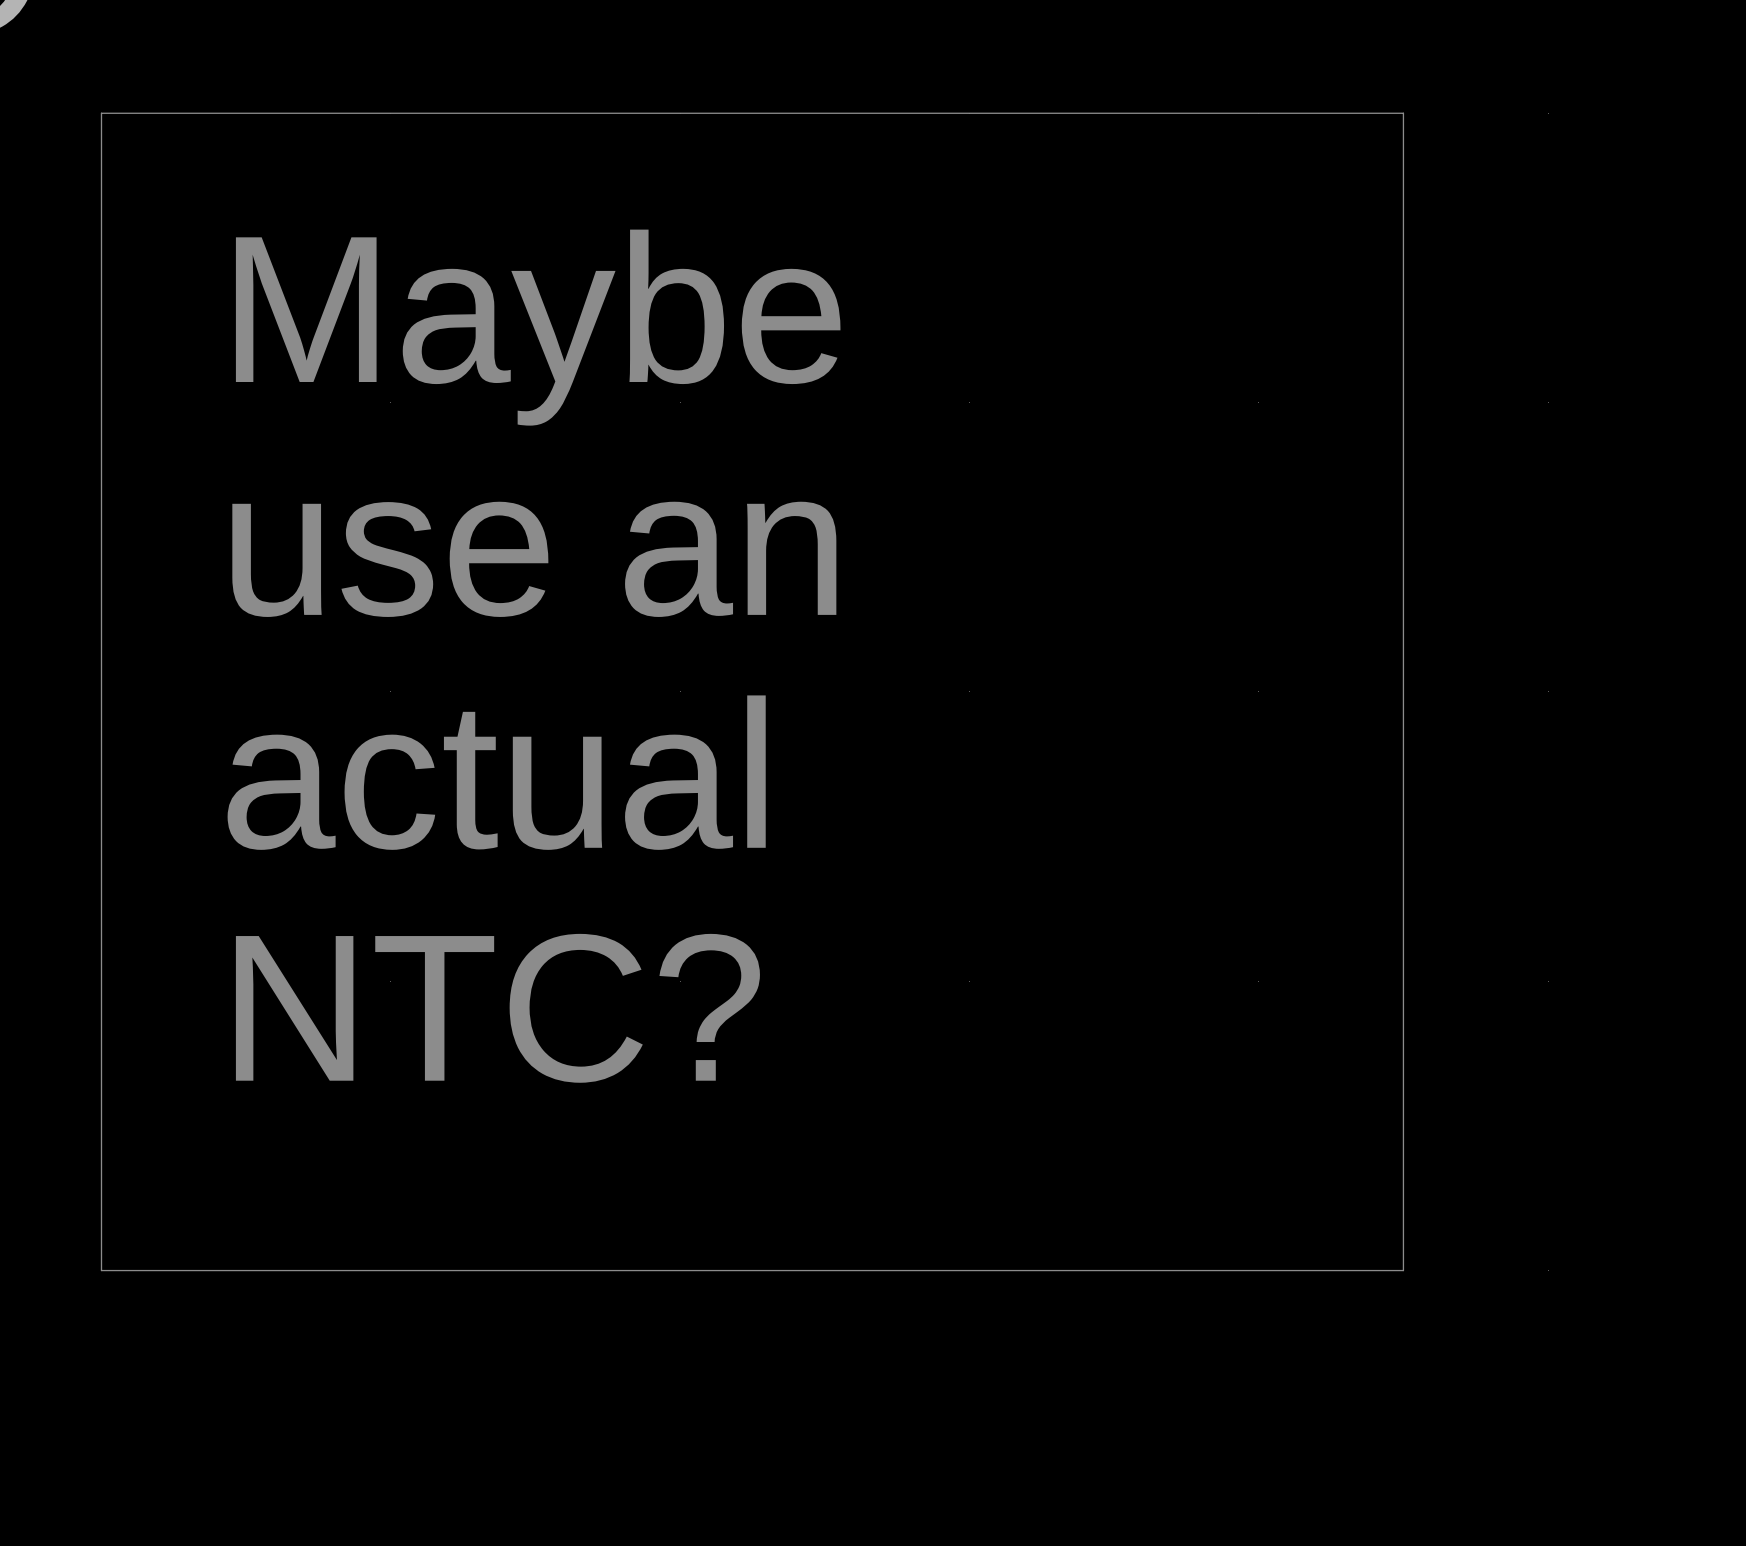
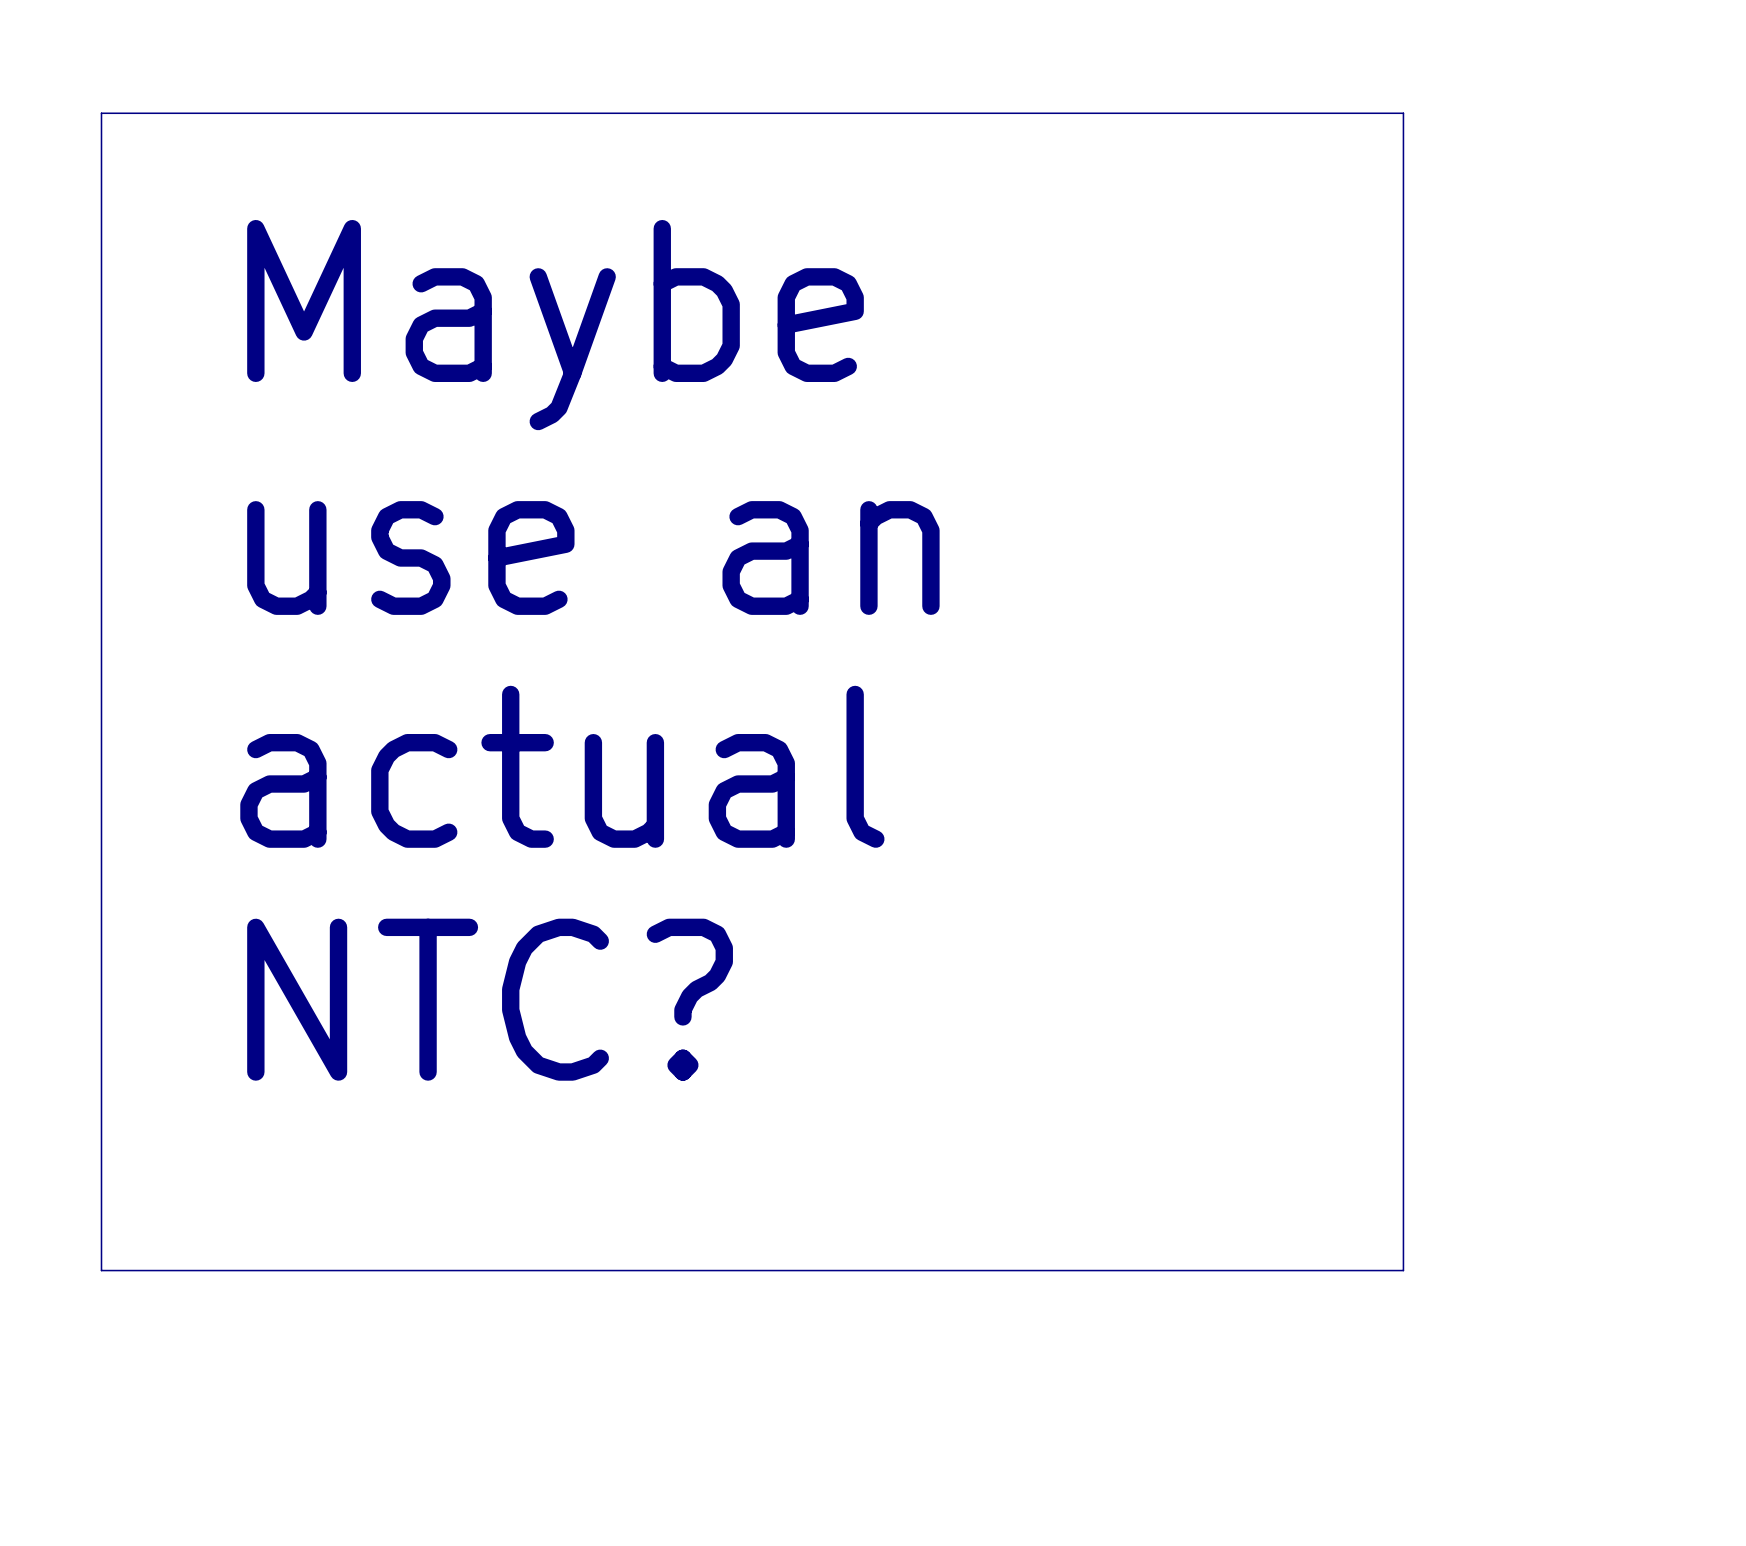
text position: Maybe (538, 327) -> Maybe (555, 325)
text position: use an (534, 559) -> use an (593, 558)
text position: actual (496, 772) -> actual (562, 766)
text position: NTC? (497, 1008) -> NTC? (490, 999)

